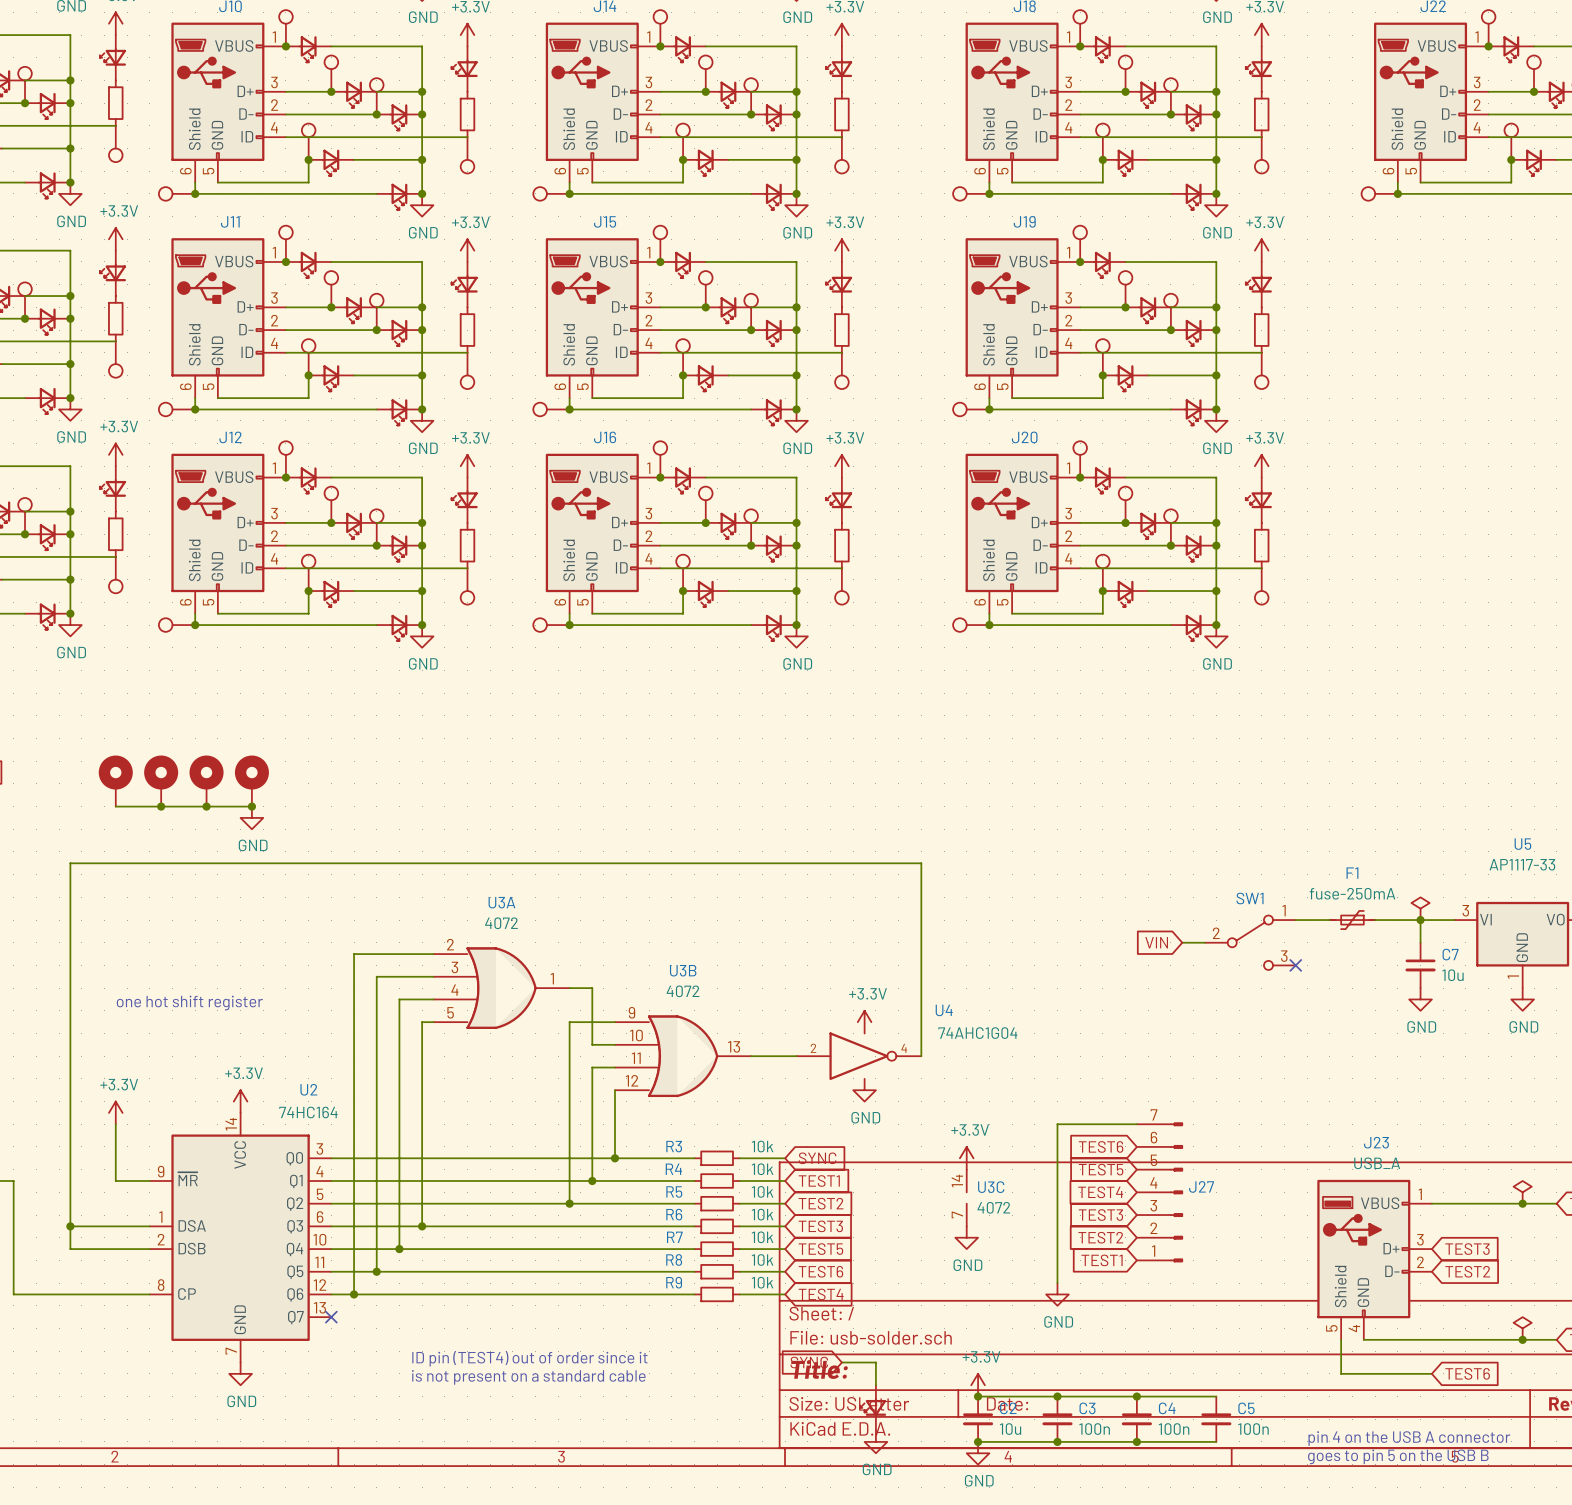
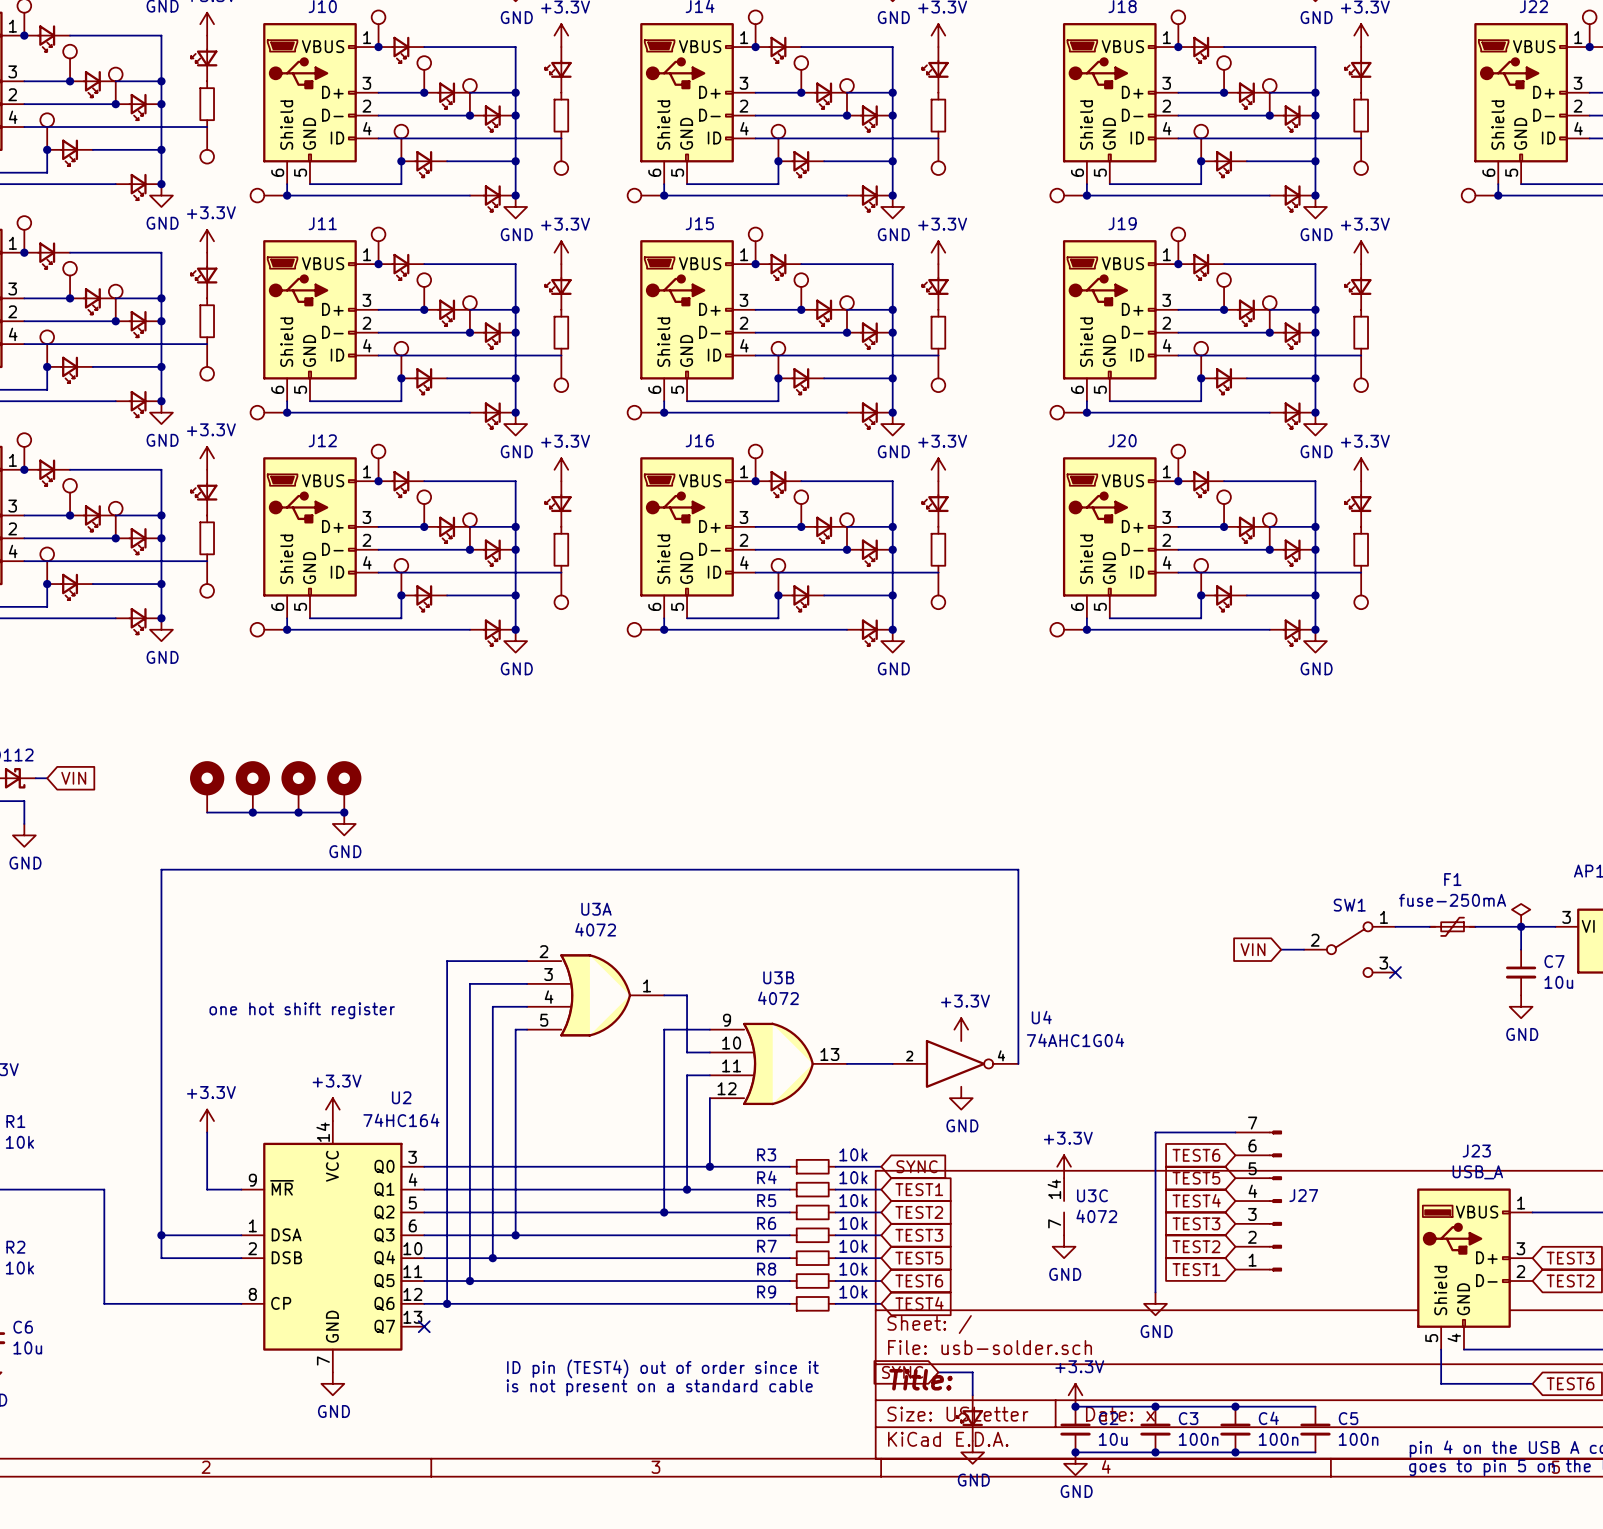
title block: Date: (1007, 1404) -> Date: x (1120, 1414)

